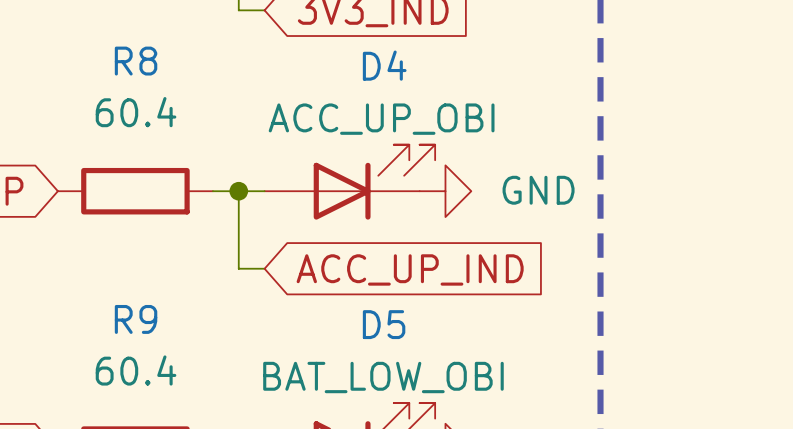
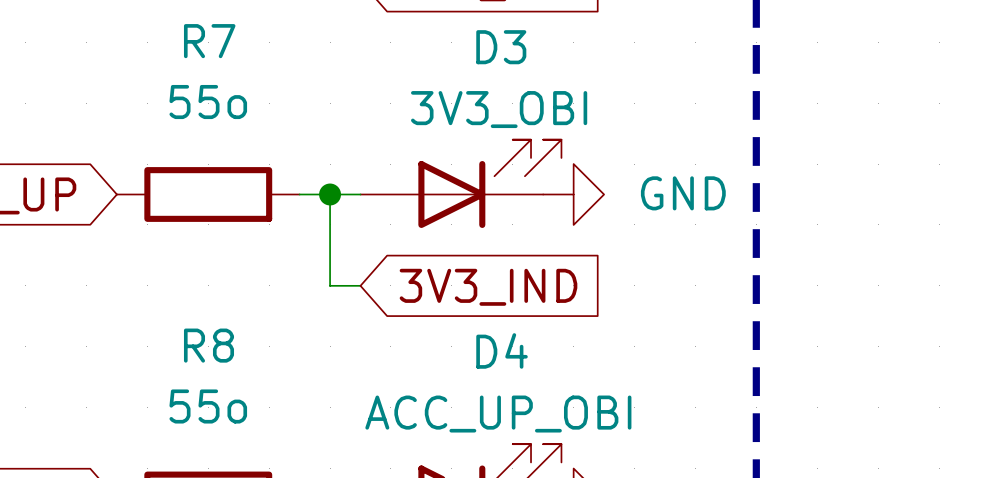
R8 name: R8 (136, 61) -> R7 (209, 41)
D4 name: D4 (384, 65) -> D3 (501, 47)
R8 value: 60.4 (136, 112) -> 55o (208, 102)
D4 value: ACC_UP_OBI (381, 119) -> 3V3_OBI (499, 109)
global label: ACC_UP_IND (410, 269) -> 3V3_IND (488, 287)
R9 name: R9 (136, 319) -> R8 (208, 345)
D5 name: D5 (384, 324) -> D4 (502, 350)
R9 value: 60.4 (136, 370) -> 55o (208, 406)
D5 value: BAT_LOW_OBI (383, 377) -> ACC_UP_OBI (498, 414)

